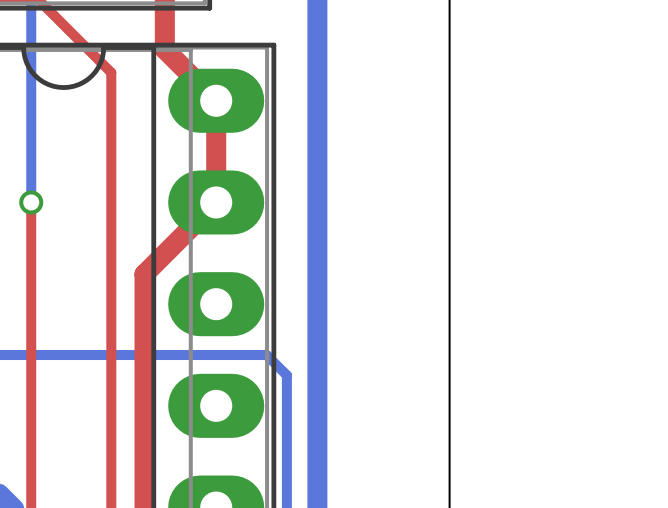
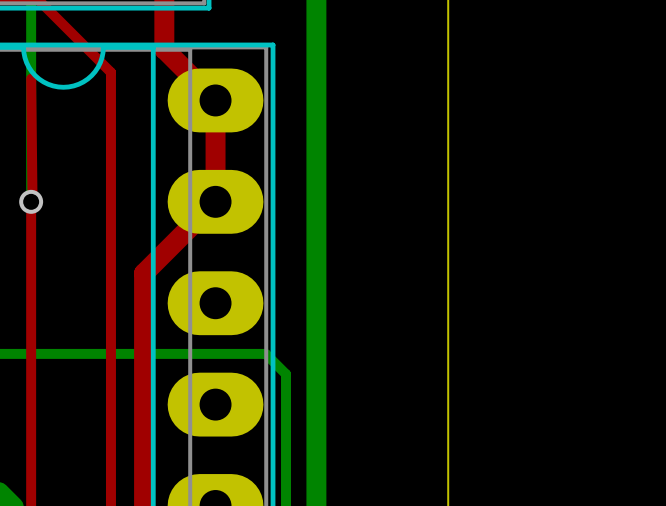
top track: none -> (31, 78) (32, 201)

